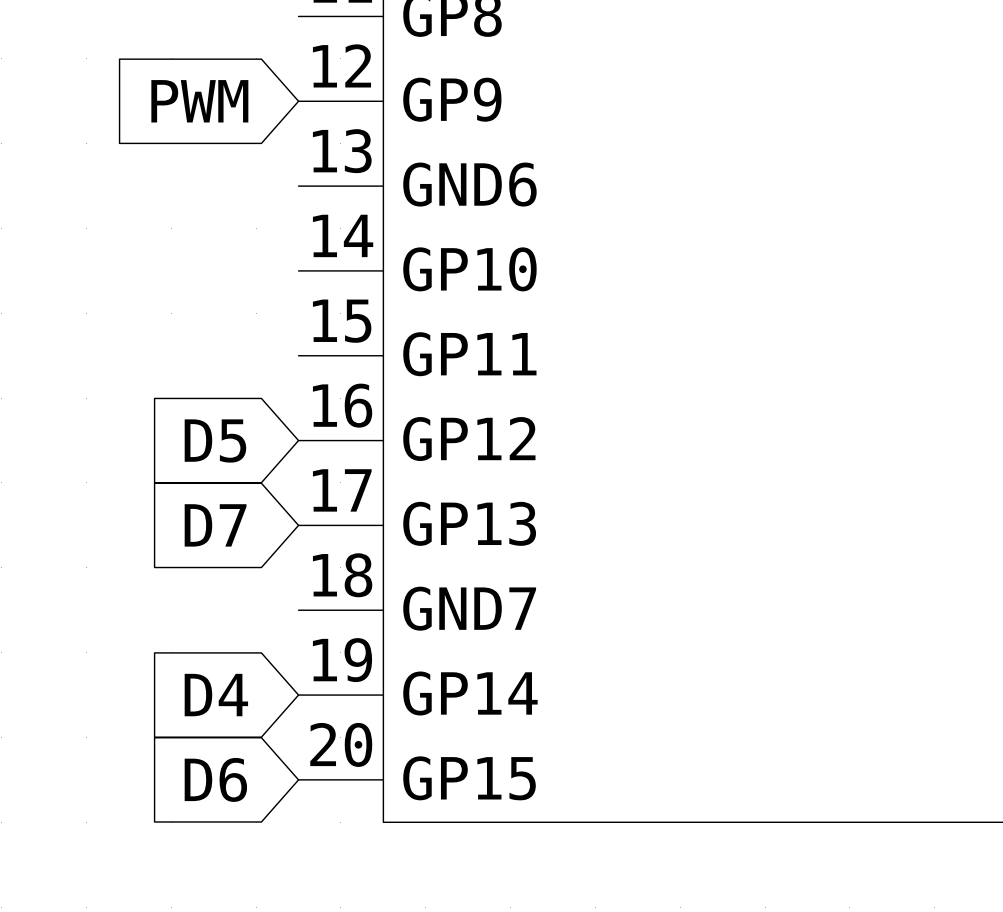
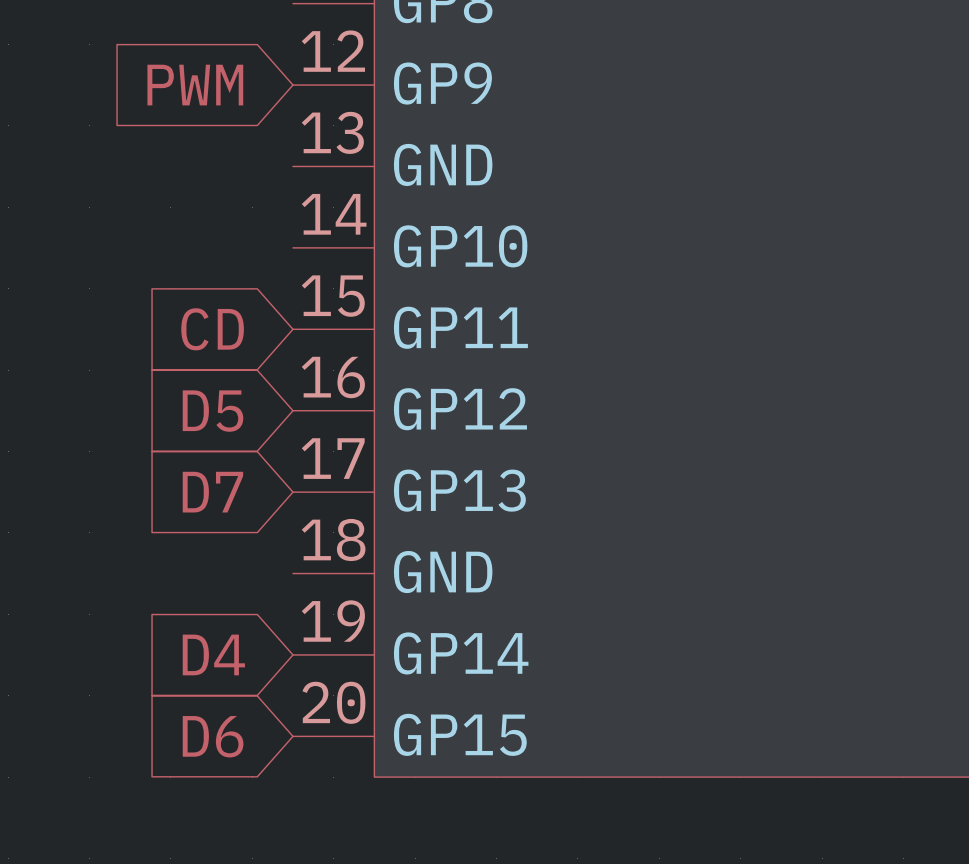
part pin name: GND6 (469, 184) -> GND (443, 164)
global label: none -> CD (212, 329)
part pin name: GND7 (469, 608) -> GND (443, 572)

